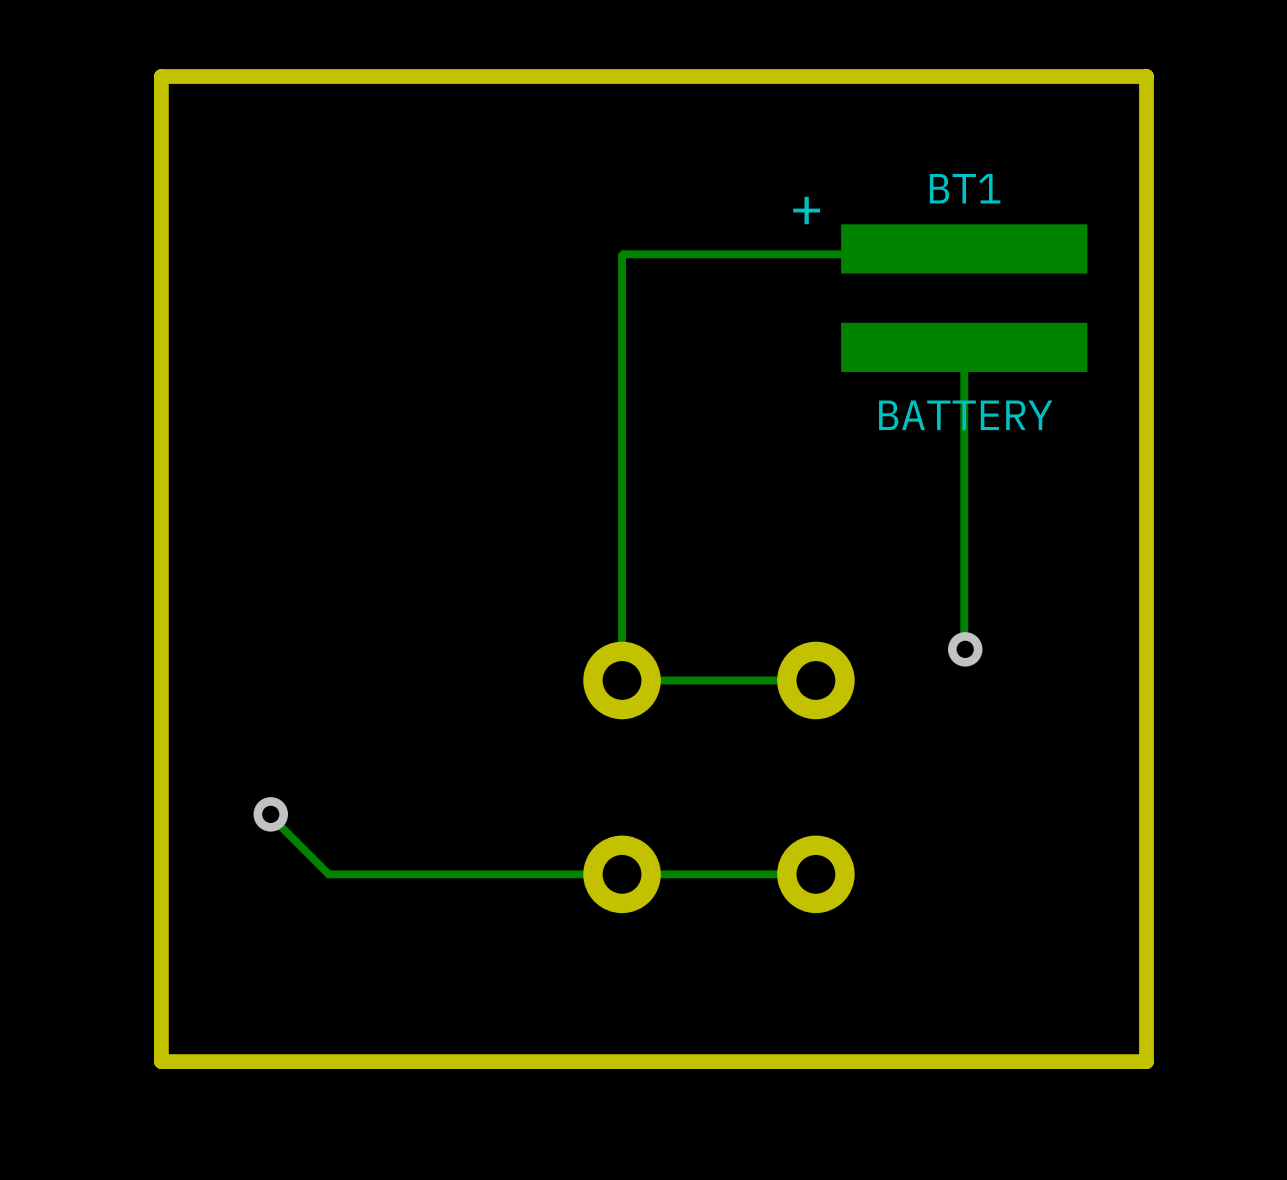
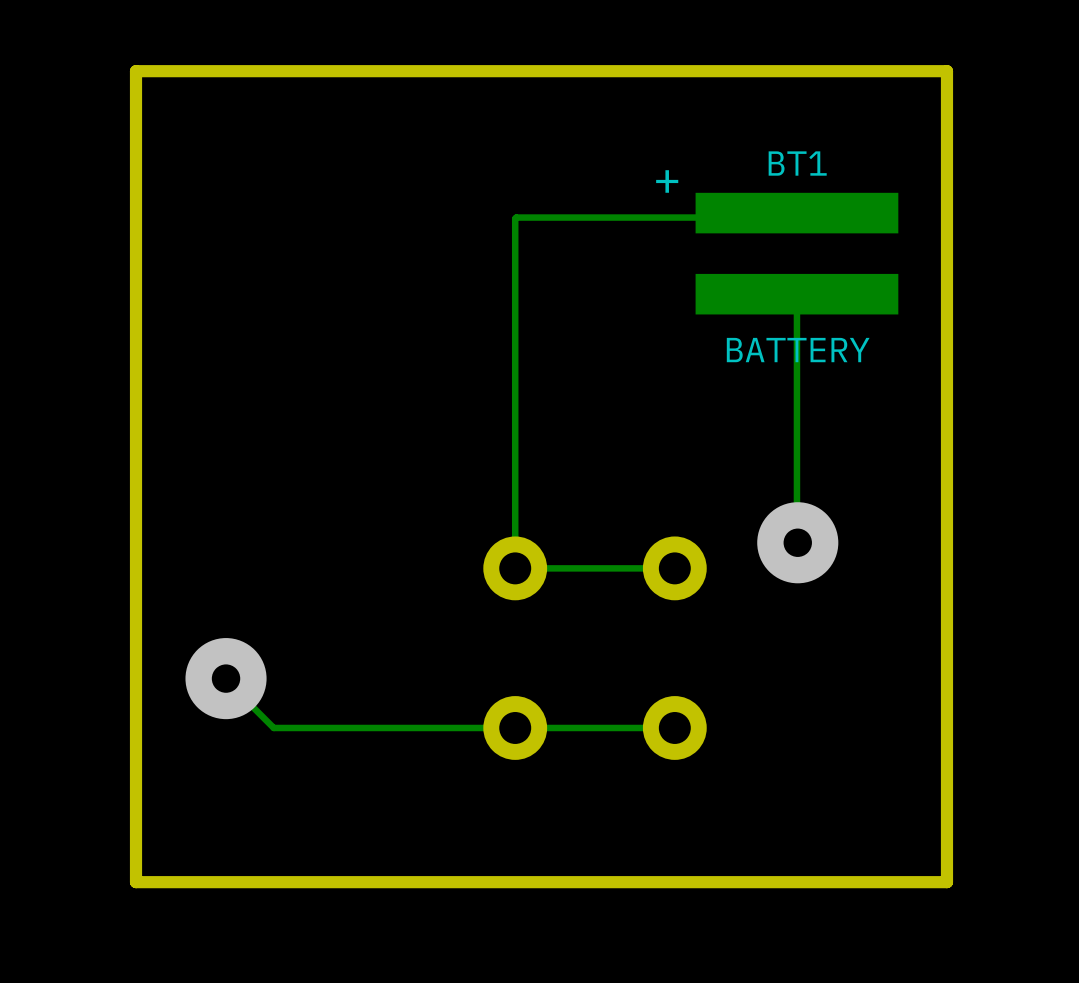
via size: [947, 632, 983, 667] -> [757, 502, 839, 584]
via size: [253, 797, 288, 832] -> [185, 638, 267, 720]

